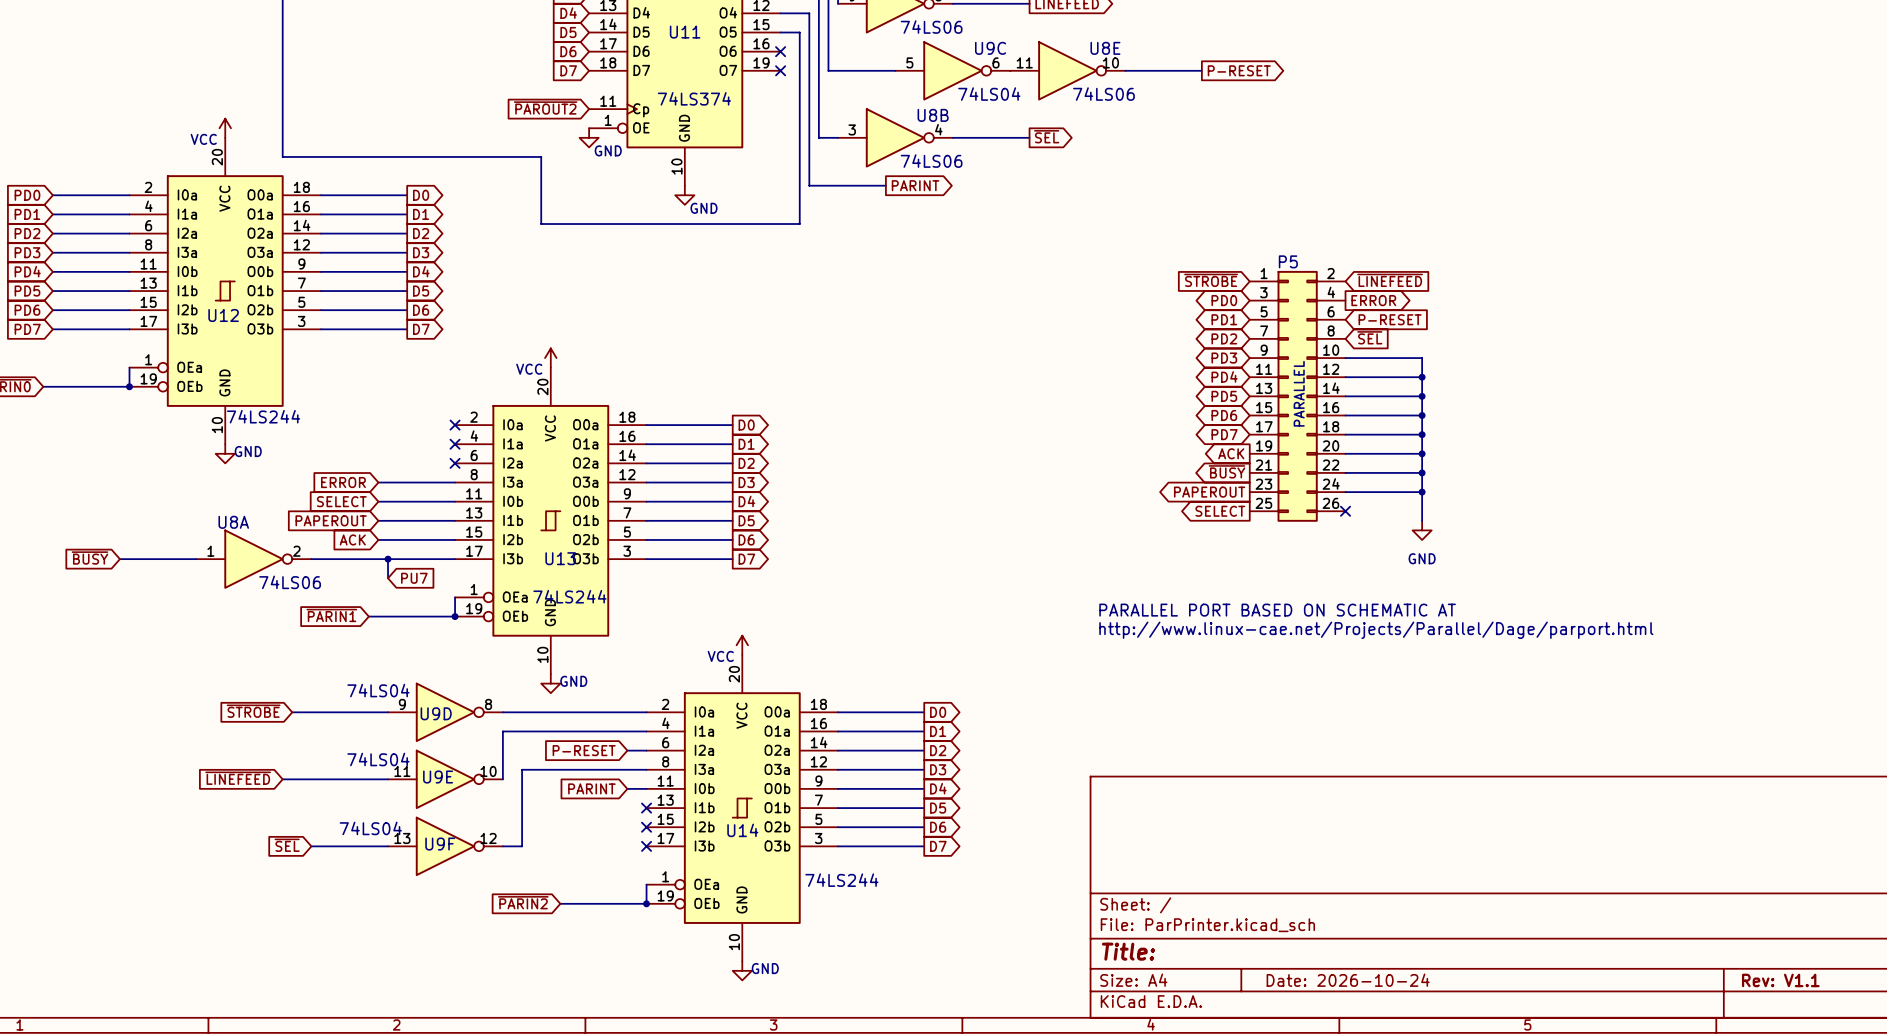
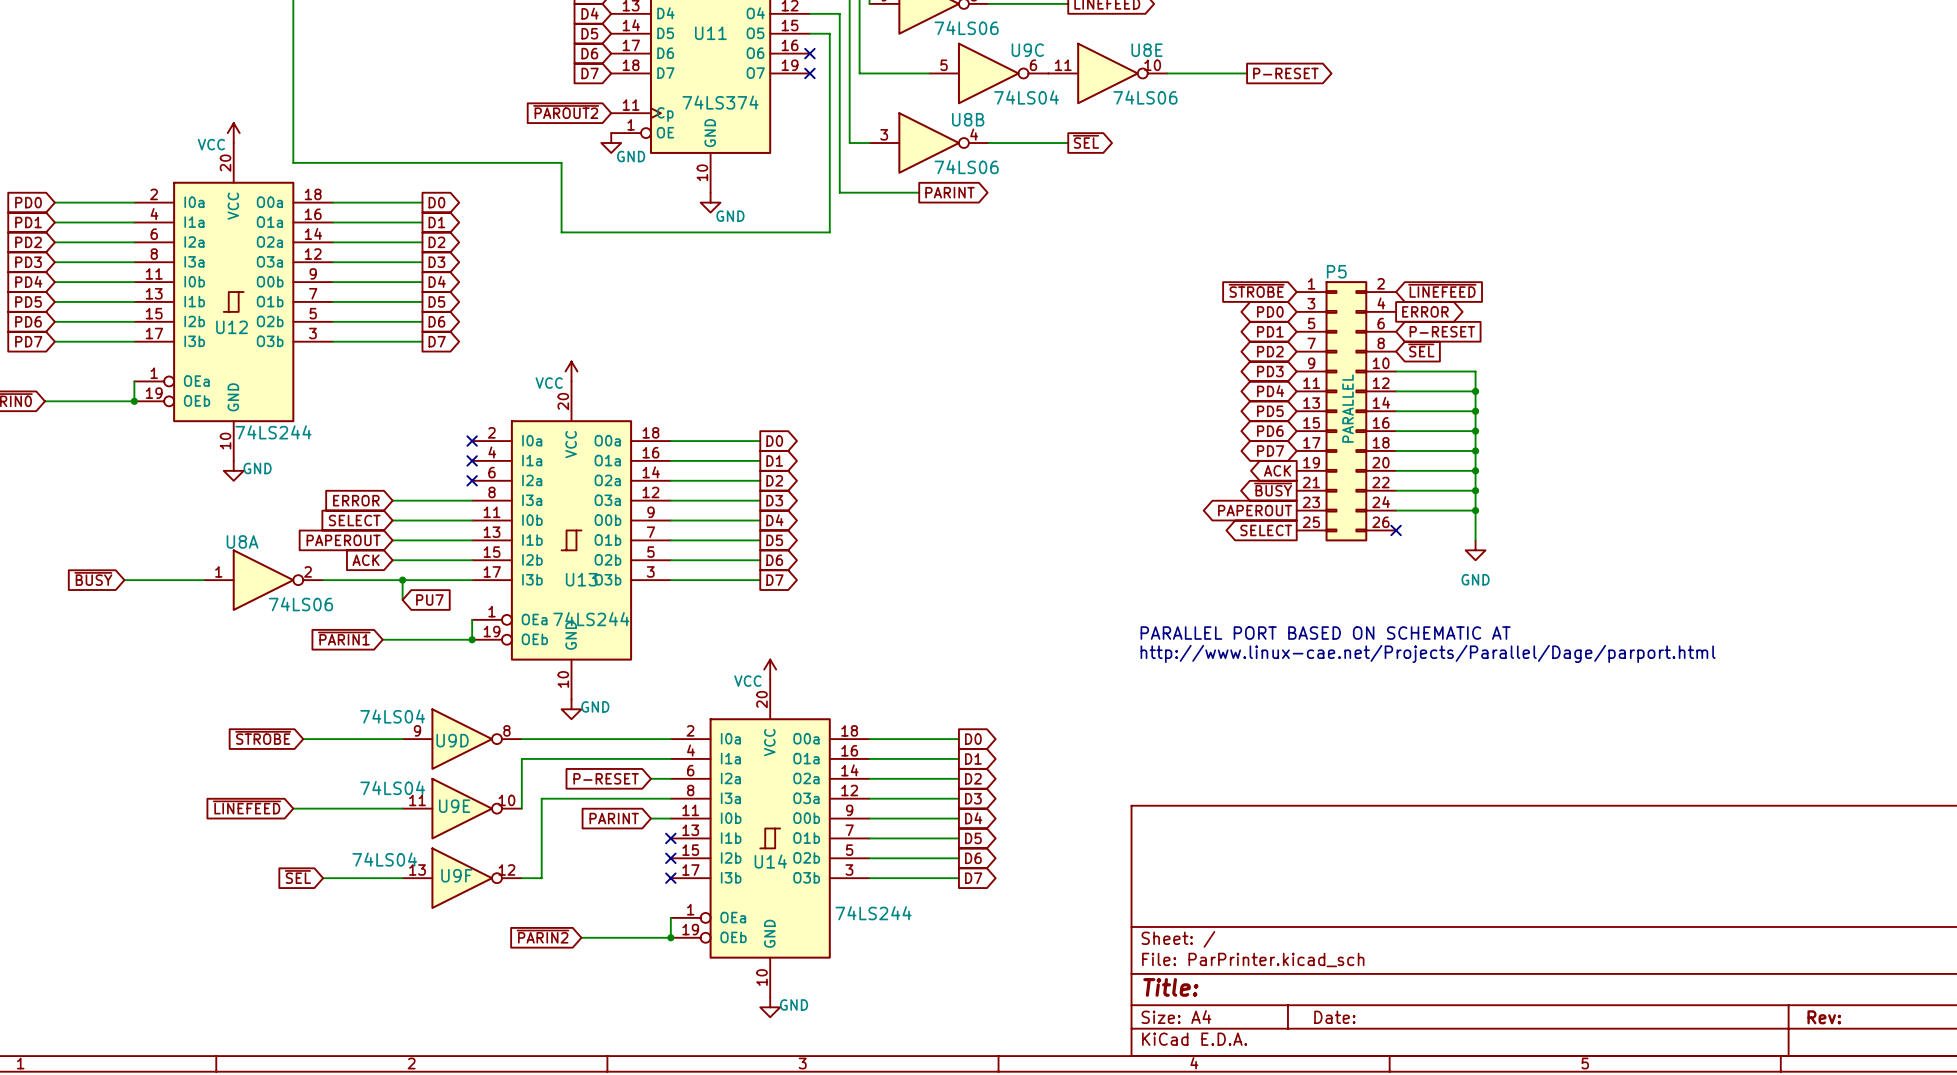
title block: Date: 2026-10-24 (1348, 980) -> Date: (1334, 1017)
title block: Rev: V1.1 (1780, 980) -> Rev: (1824, 1017)

